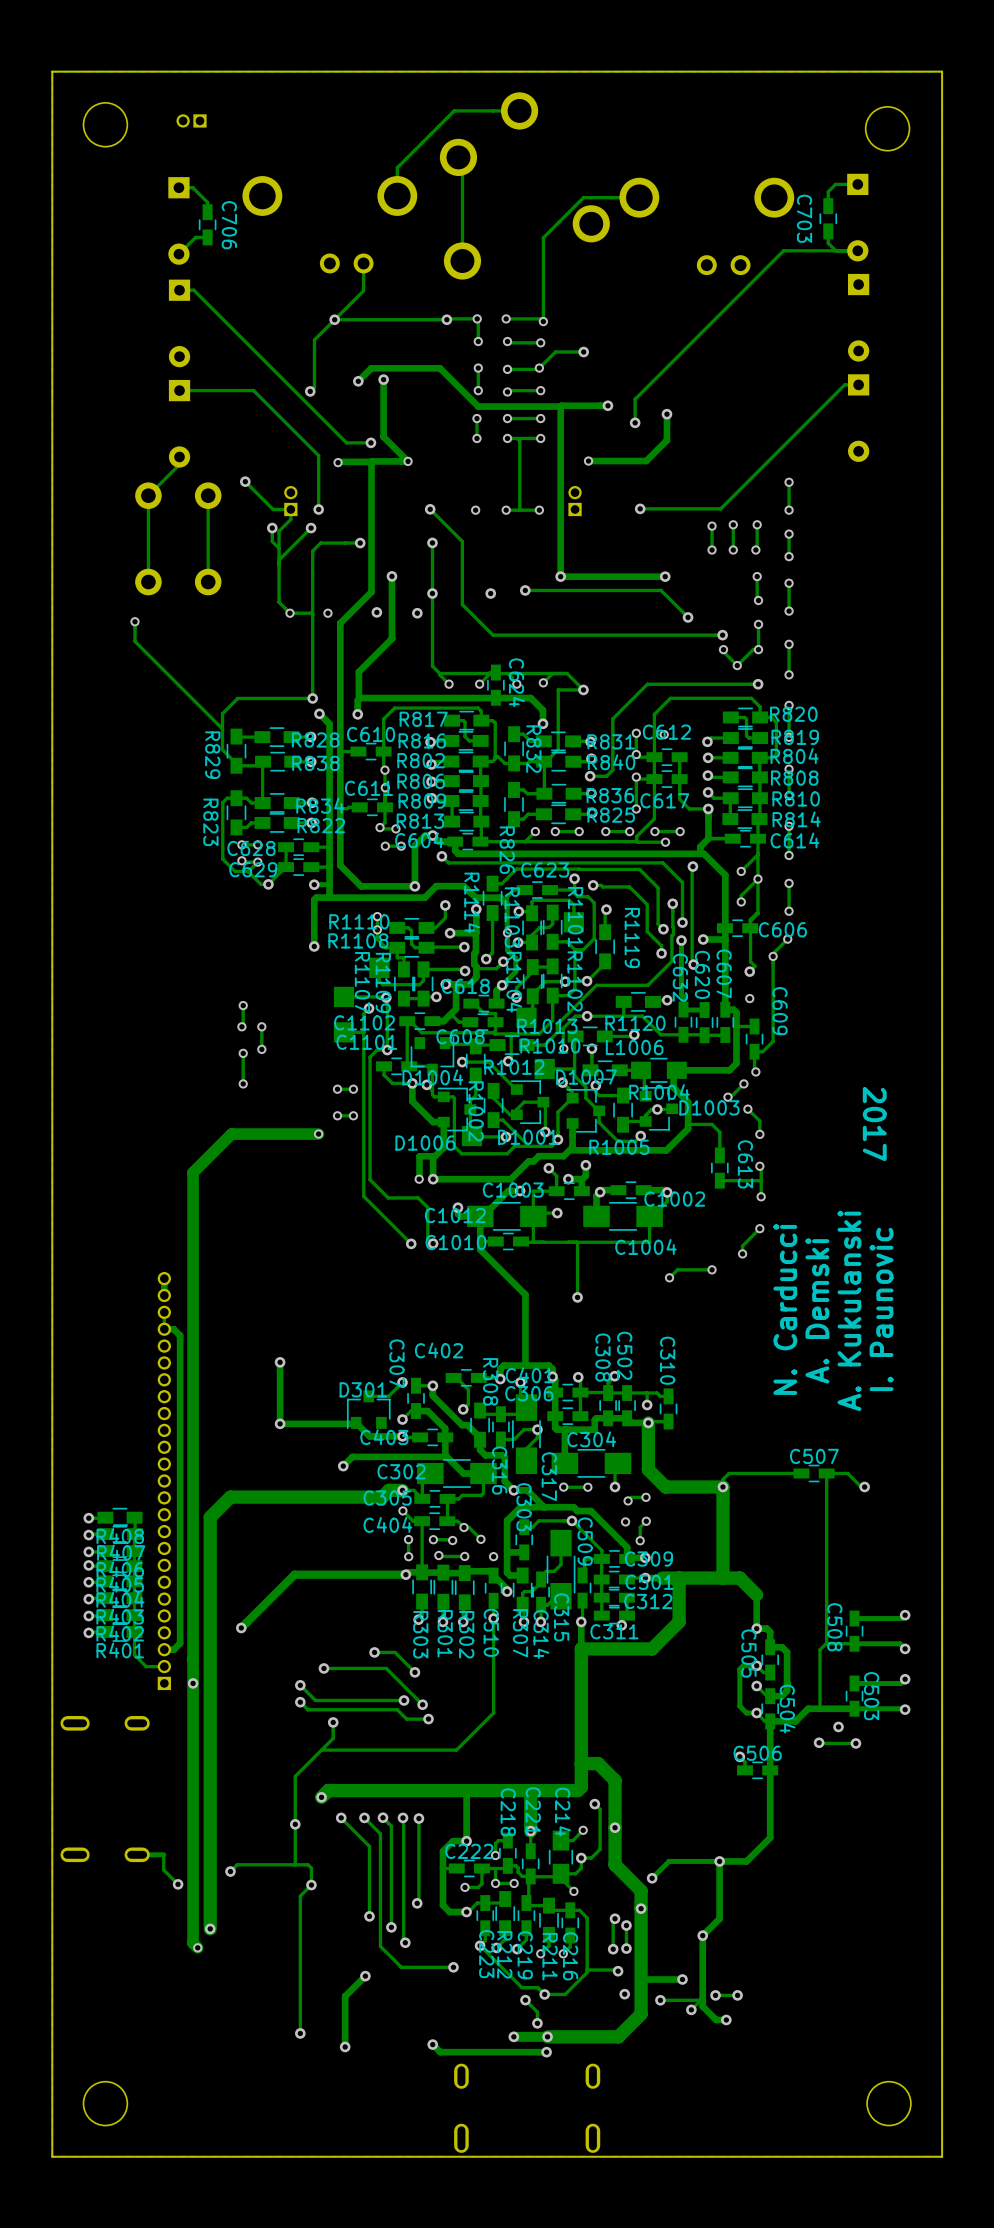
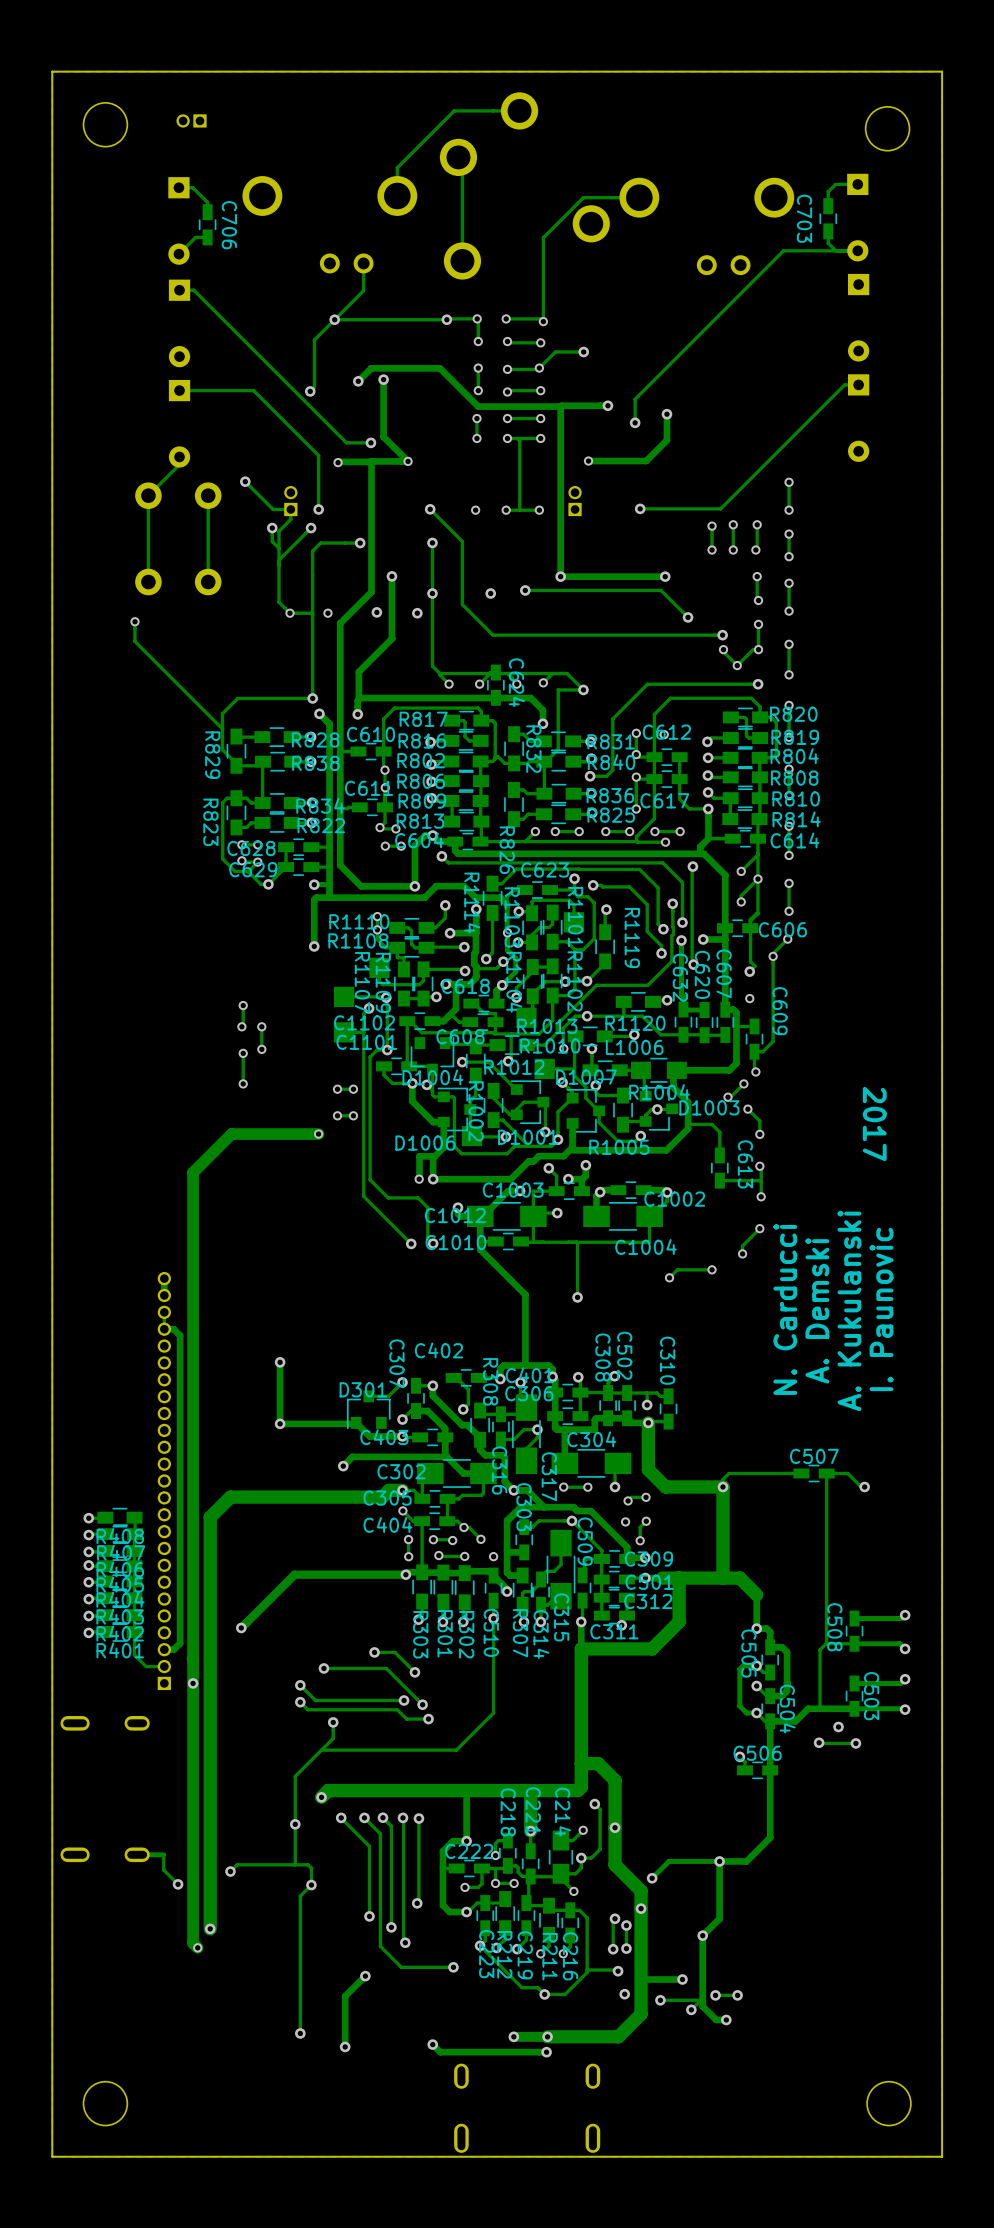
track: (525, 2000) (537, 2012) (537, 2023) -> none
via: (525, 2000) -> none
via: (537, 2023) -> none

